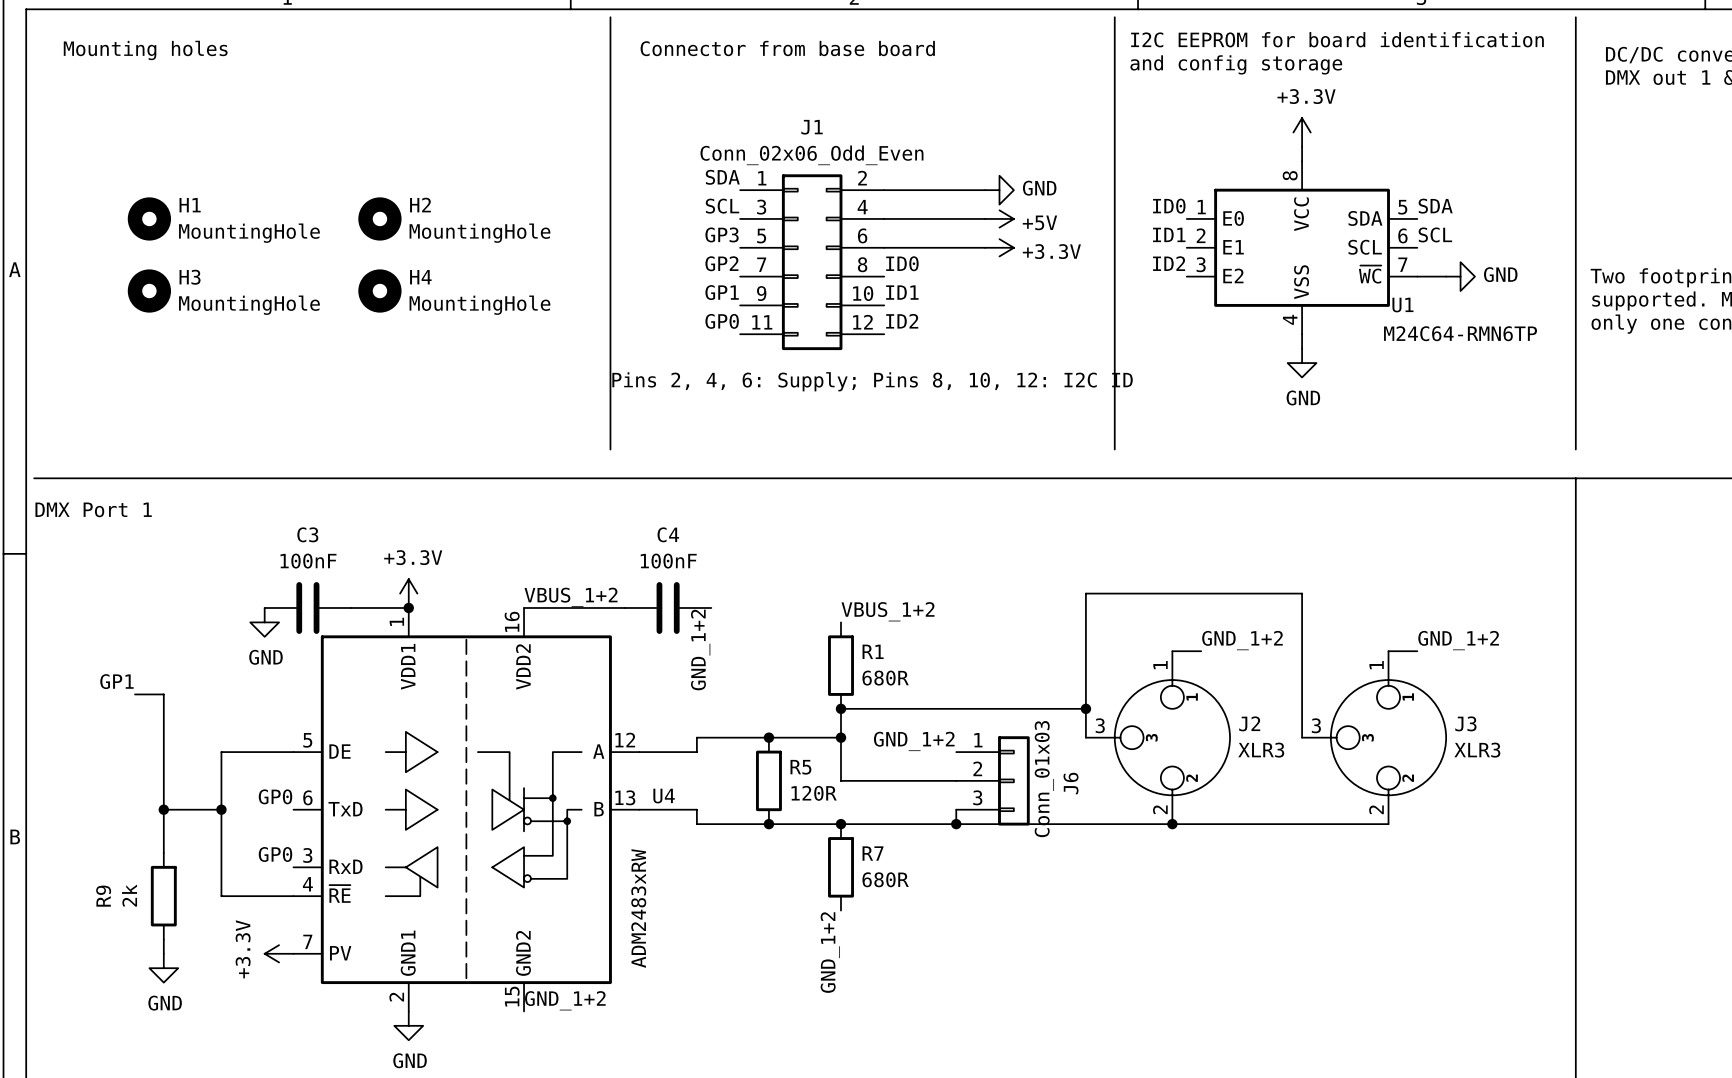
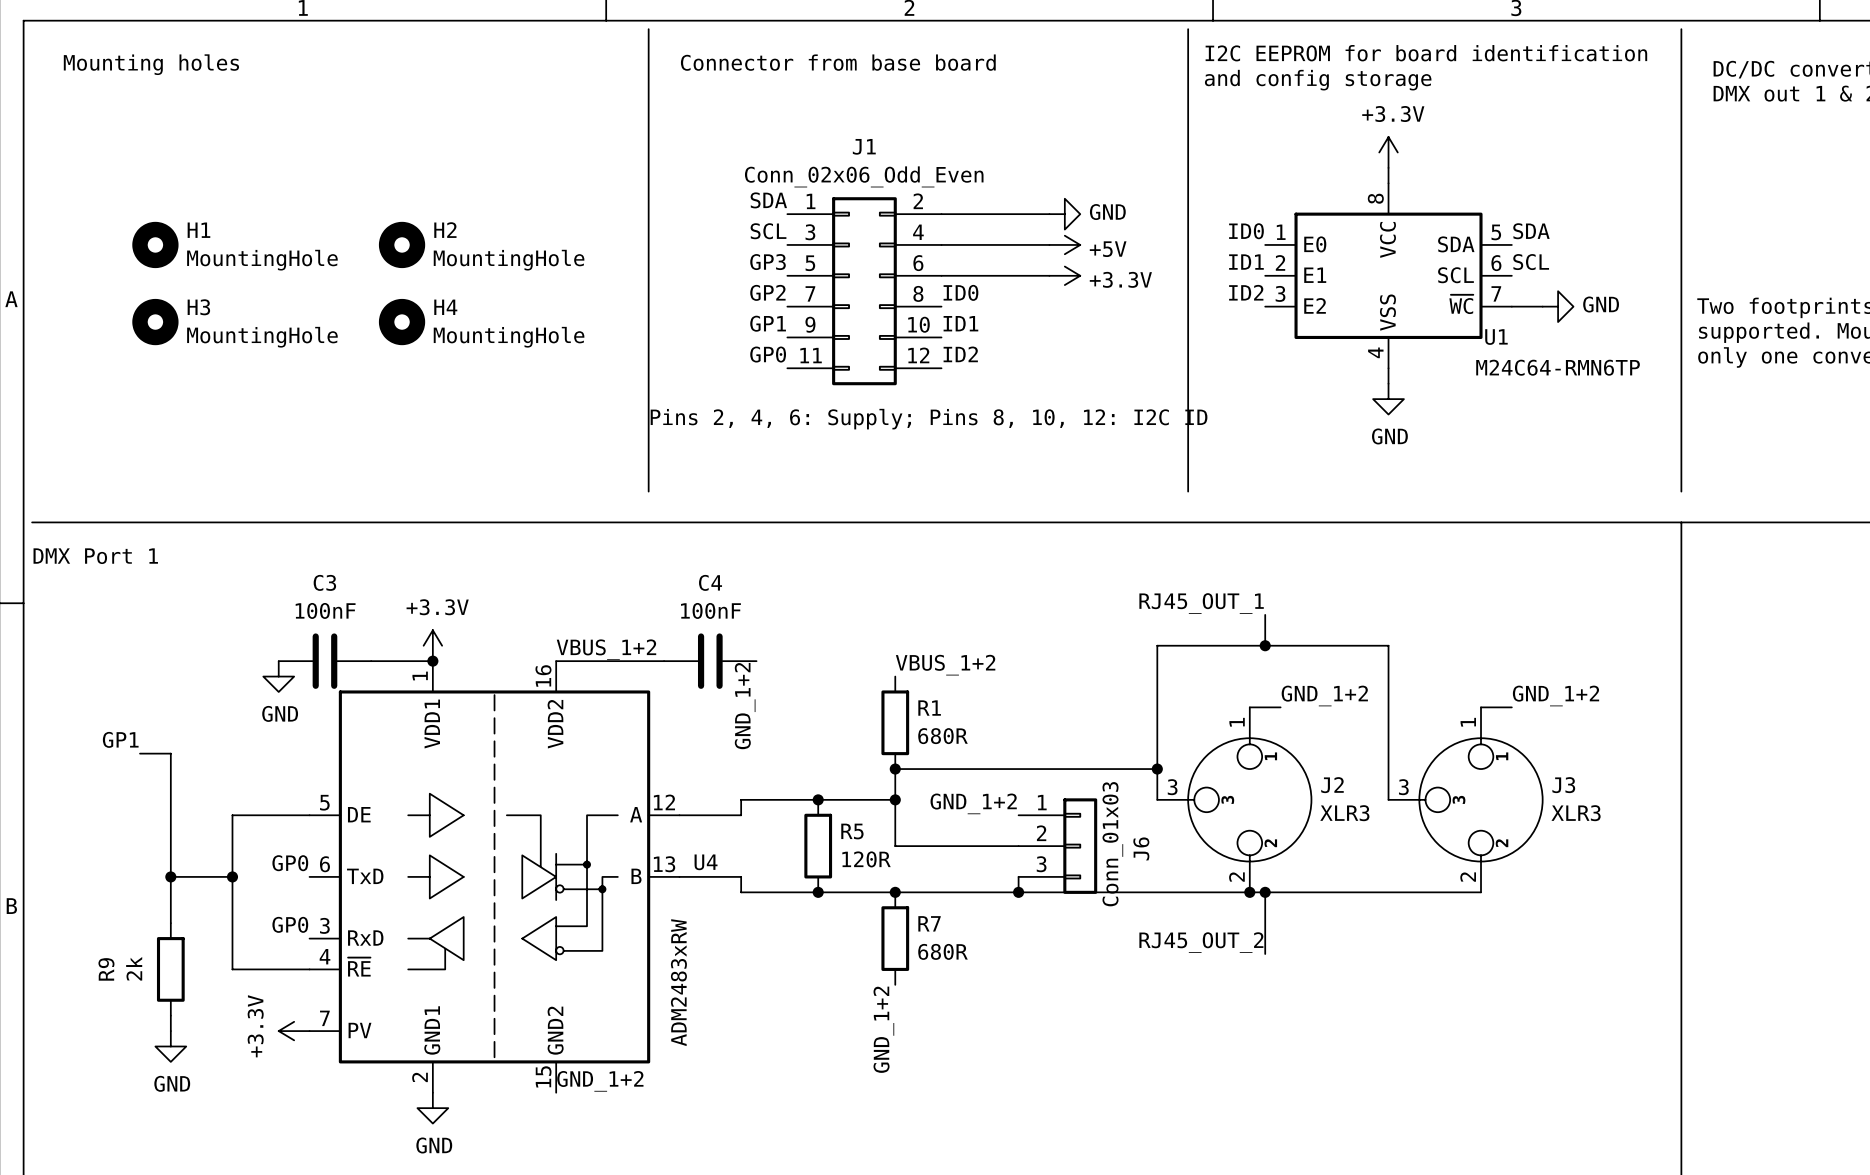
label: none -> RJ45_OUT_1 (1201, 603)
wire: none -> (1265, 614) (1265, 645)
junction: none -> (1265, 645)
wire: none -> (1265, 892) (1265, 954)
junction: none -> (1265, 892)
label: none -> RJ45_OUT_2 (1201, 942)

